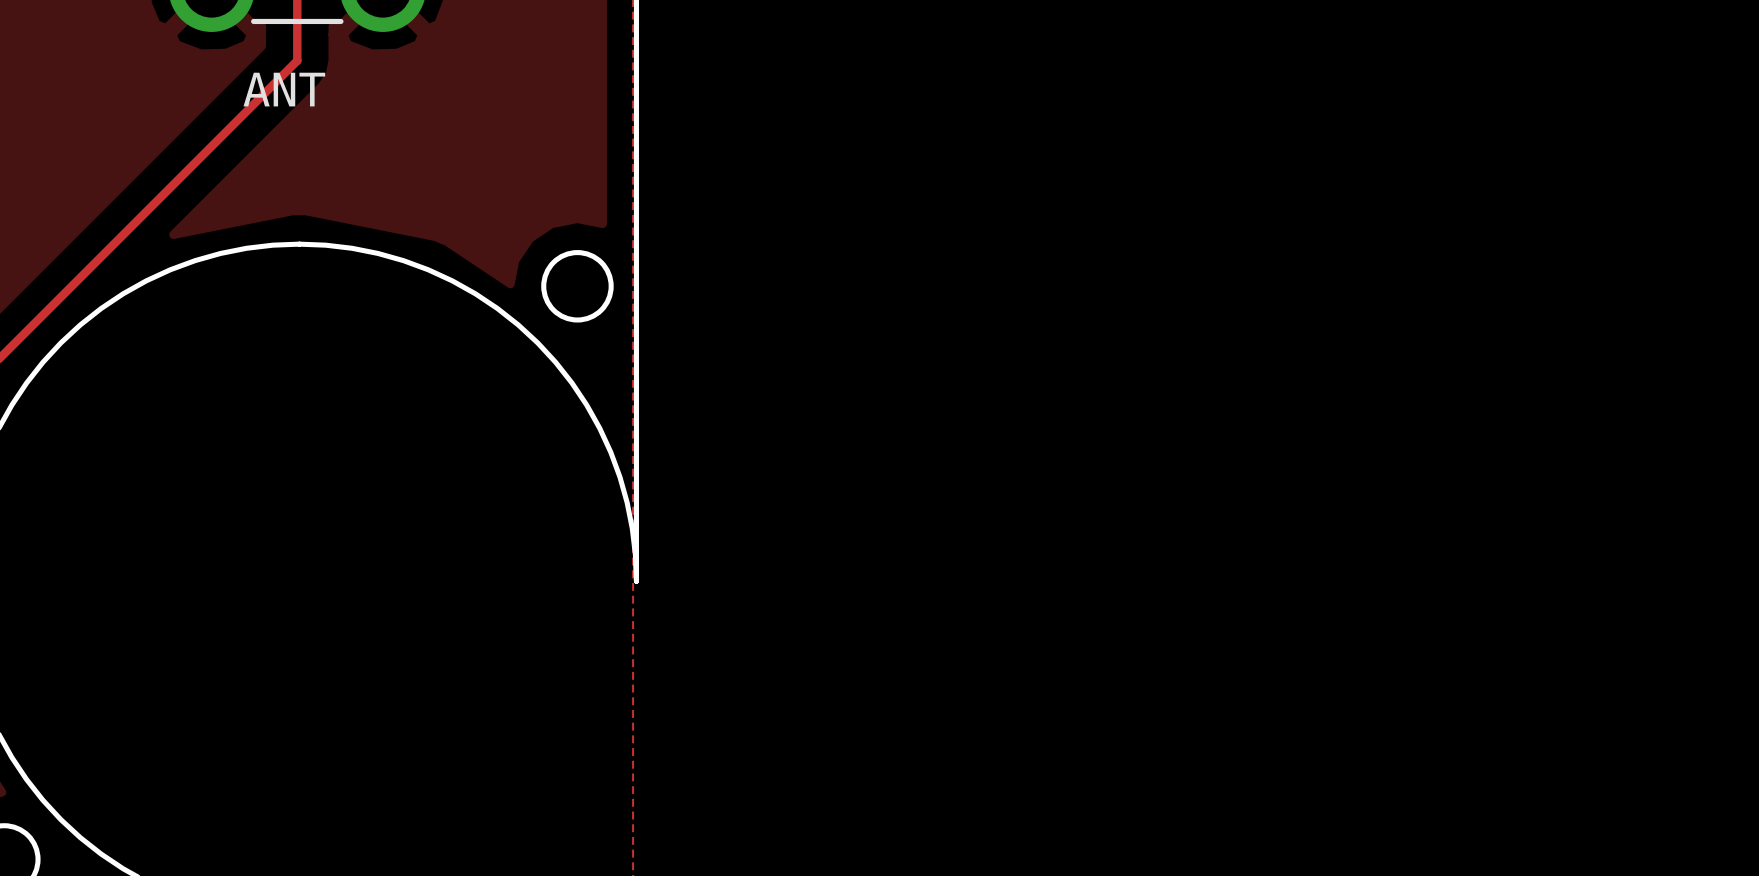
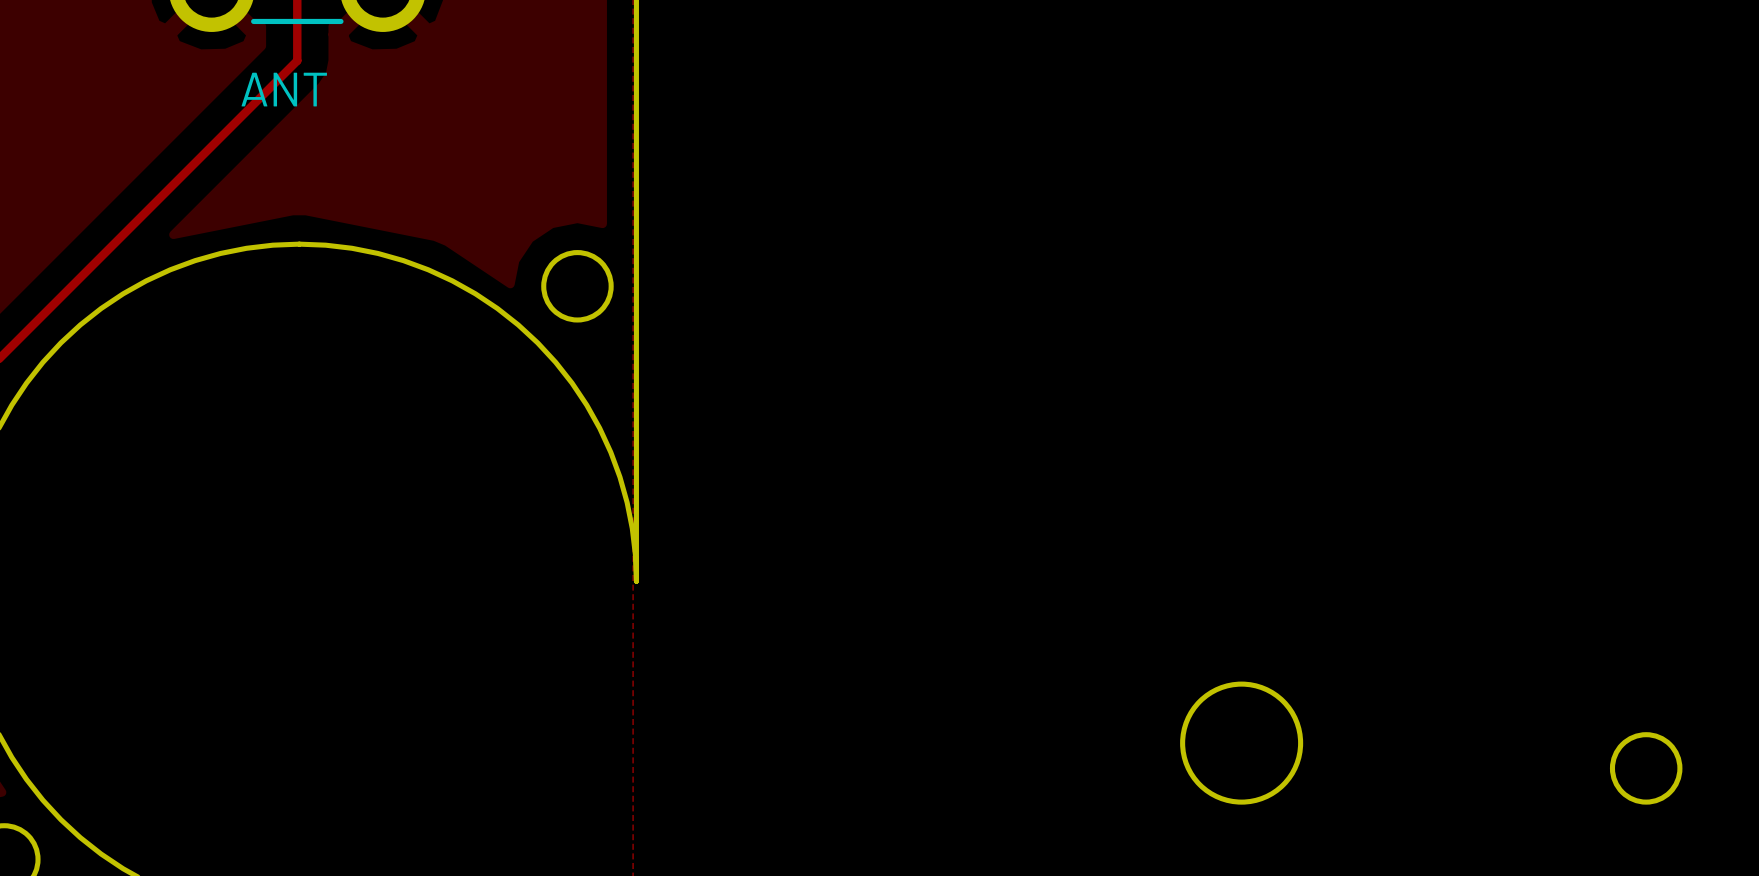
round board edge: none -> [1180, 681, 1304, 805]
round board edge: none -> [1609, 732, 1683, 805]

